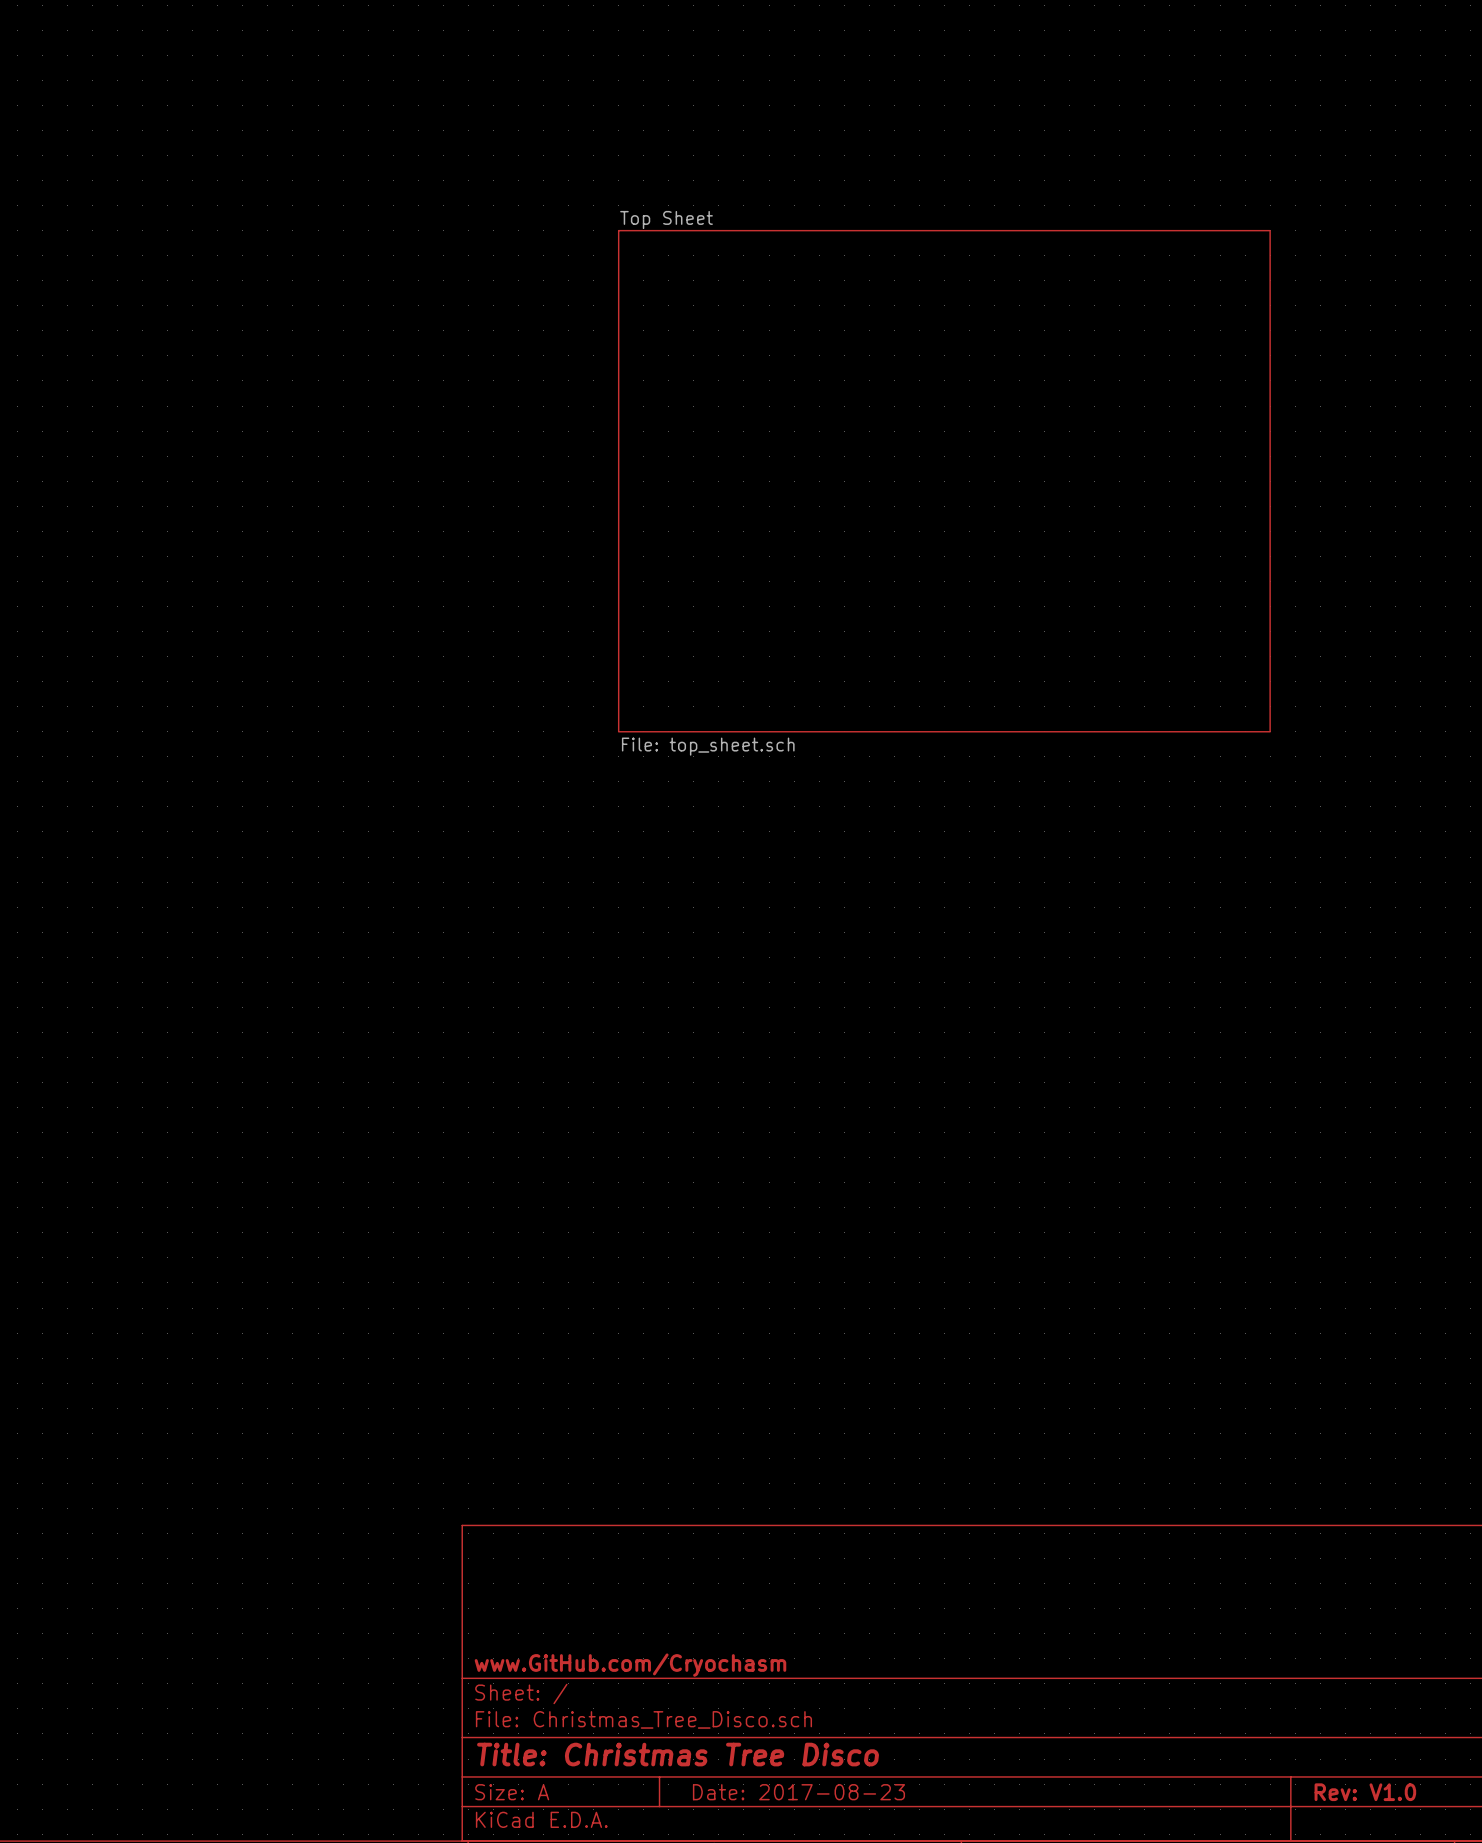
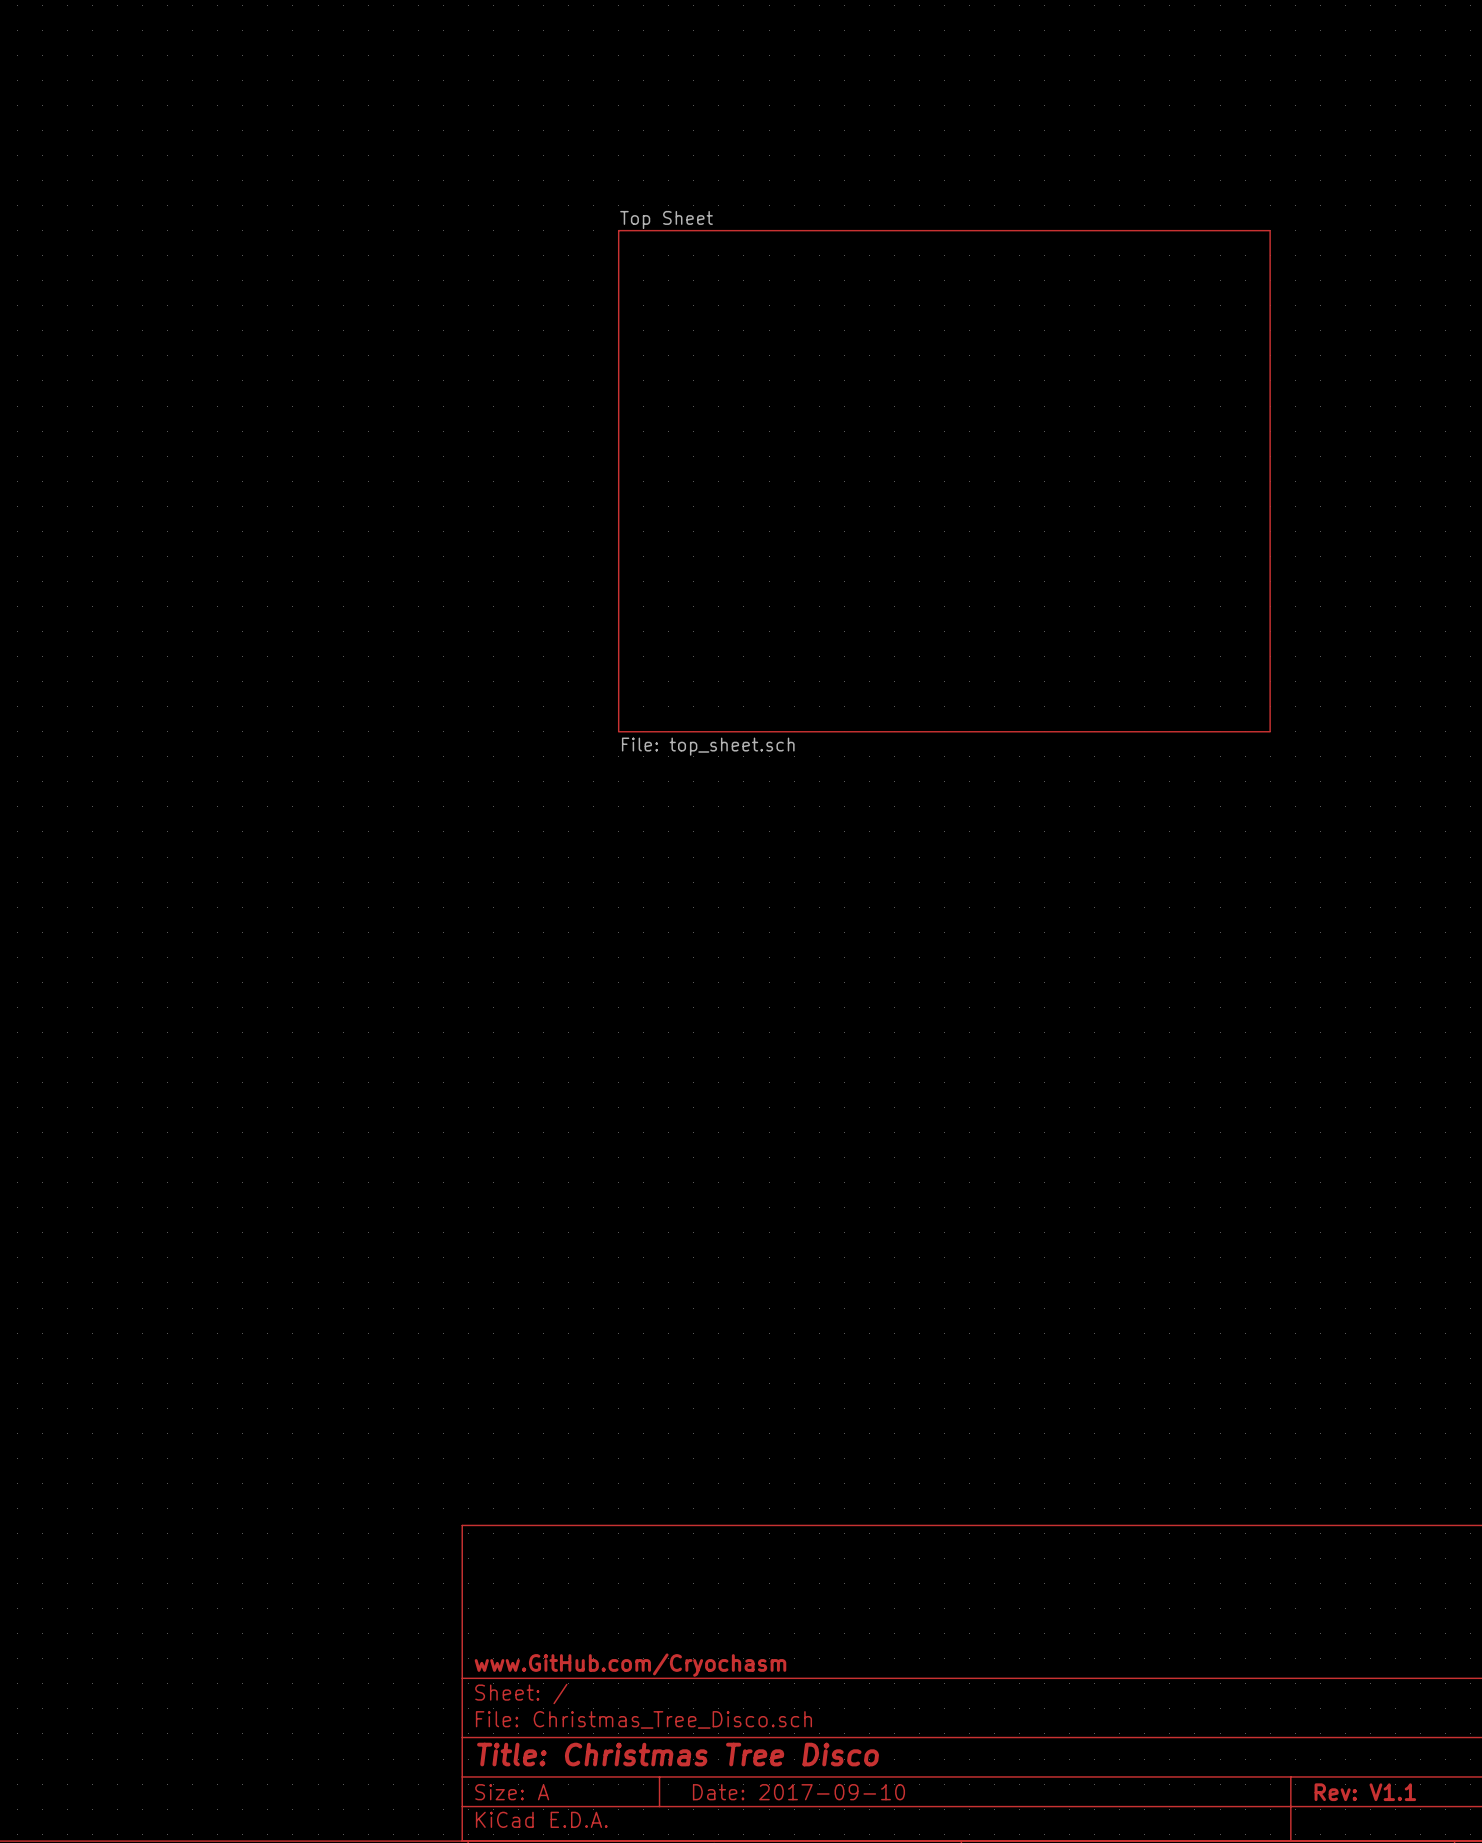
title block: Date: 2017-08-23 (798, 1792) -> Date: 2017-09-10 (798, 1792)
title block: Rev: V1.0 (1365, 1792) -> Rev: V1.1 (1365, 1792)

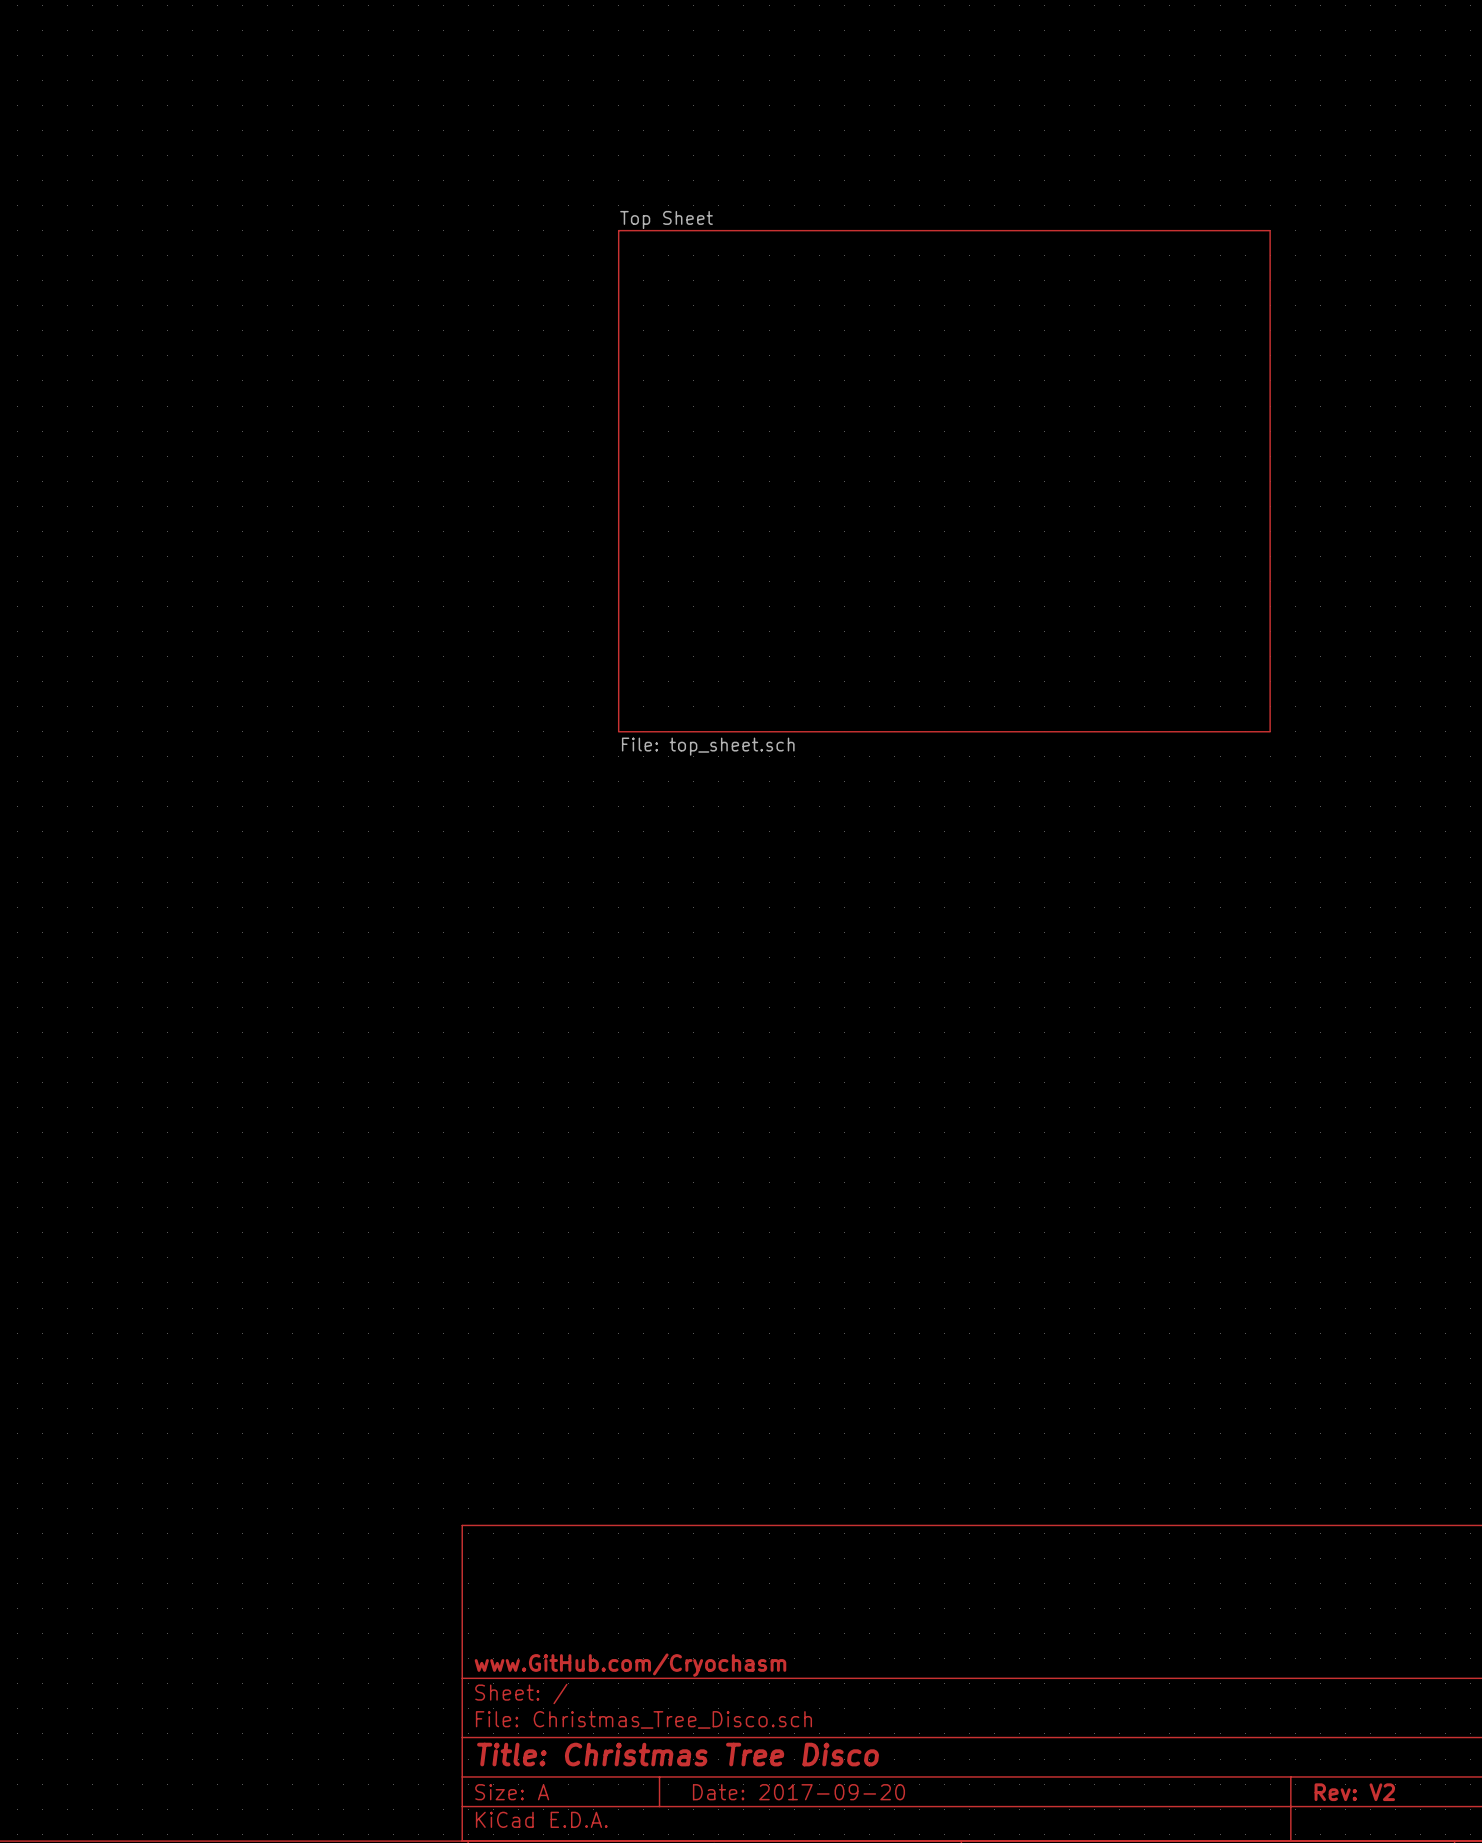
title block: Date: 2017-09-10 (798, 1792) -> Date: 2017-09-20 (798, 1792)
title block: Rev: V1.1 (1365, 1792) -> Rev: V2 (1354, 1792)

